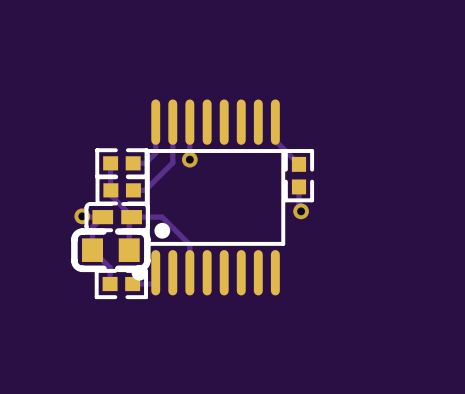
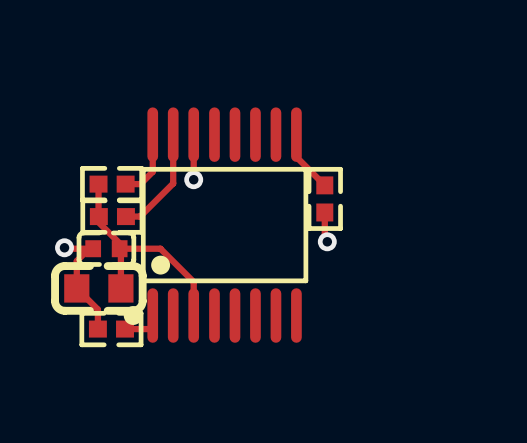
part footprint: [84, 202, 150, 233] -> [76, 230, 137, 267]

